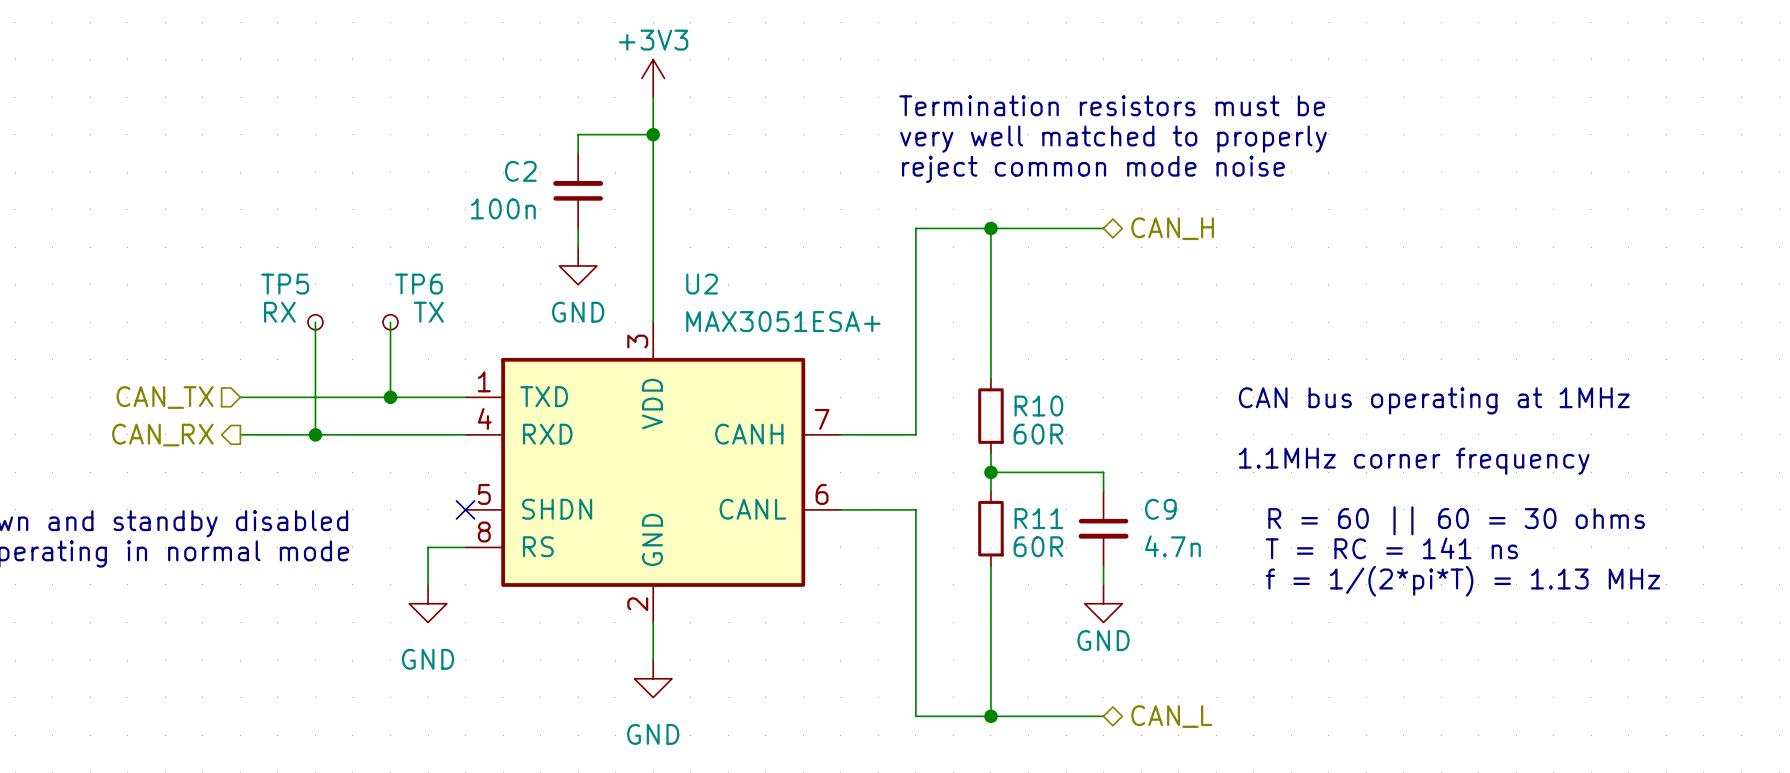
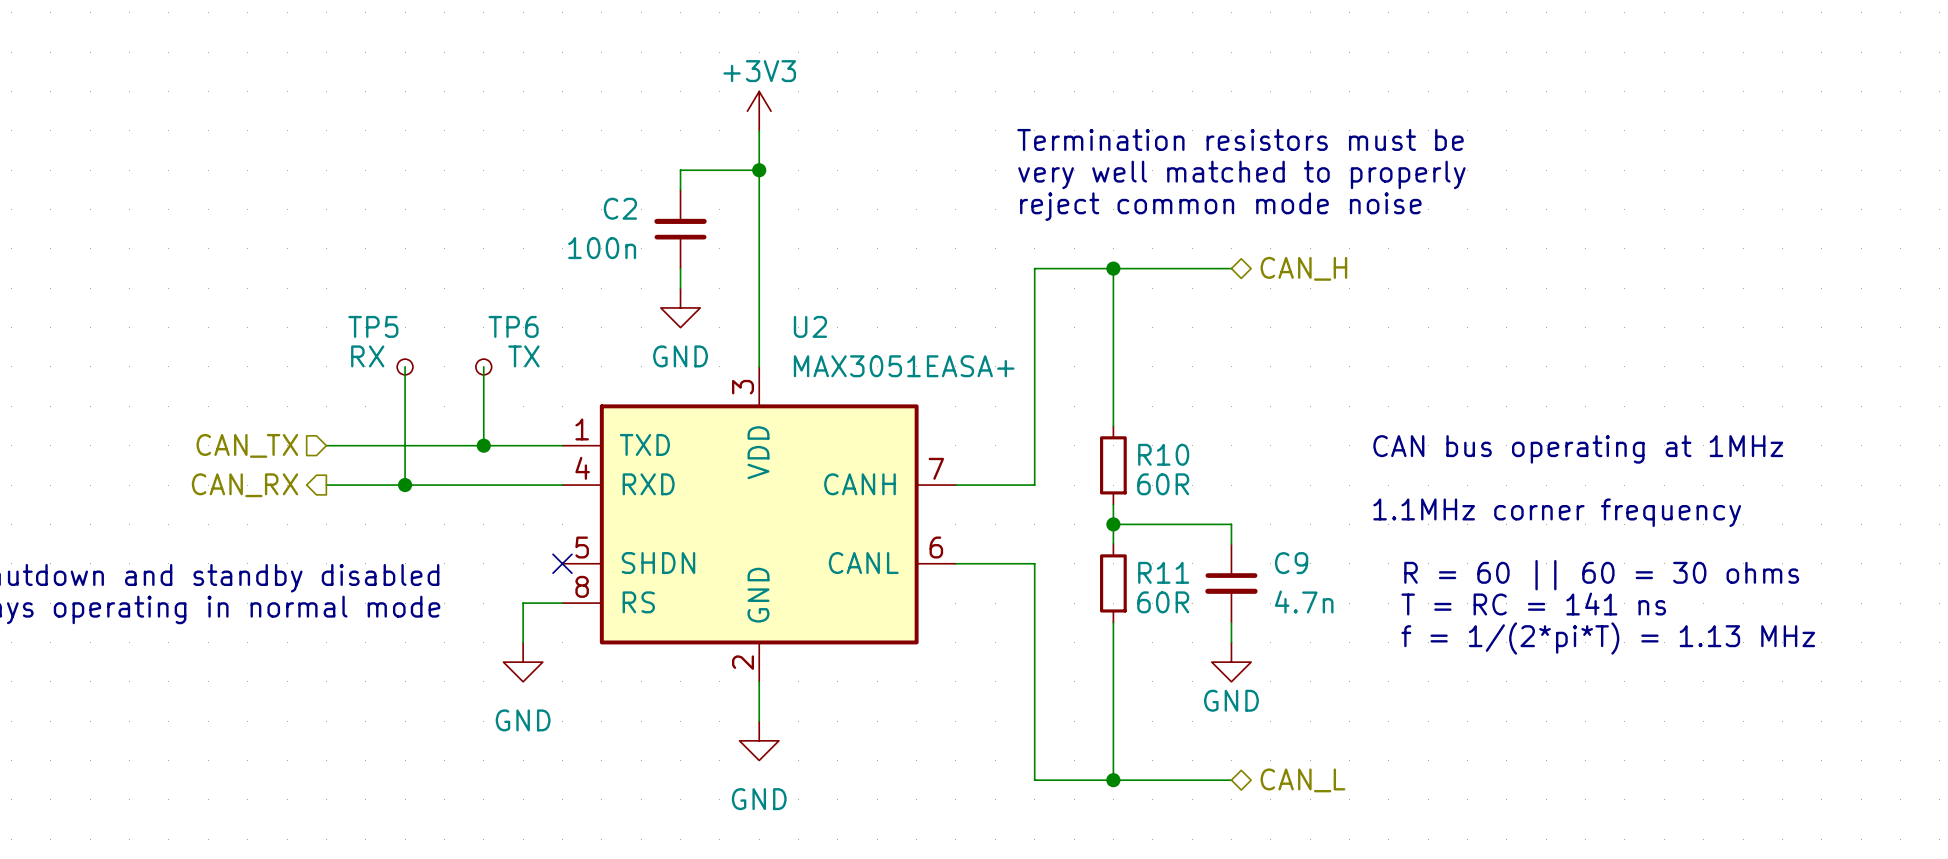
U2 value: MAX3051ESA+ (783, 321) -> MAX3051EASA+ (904, 366)

